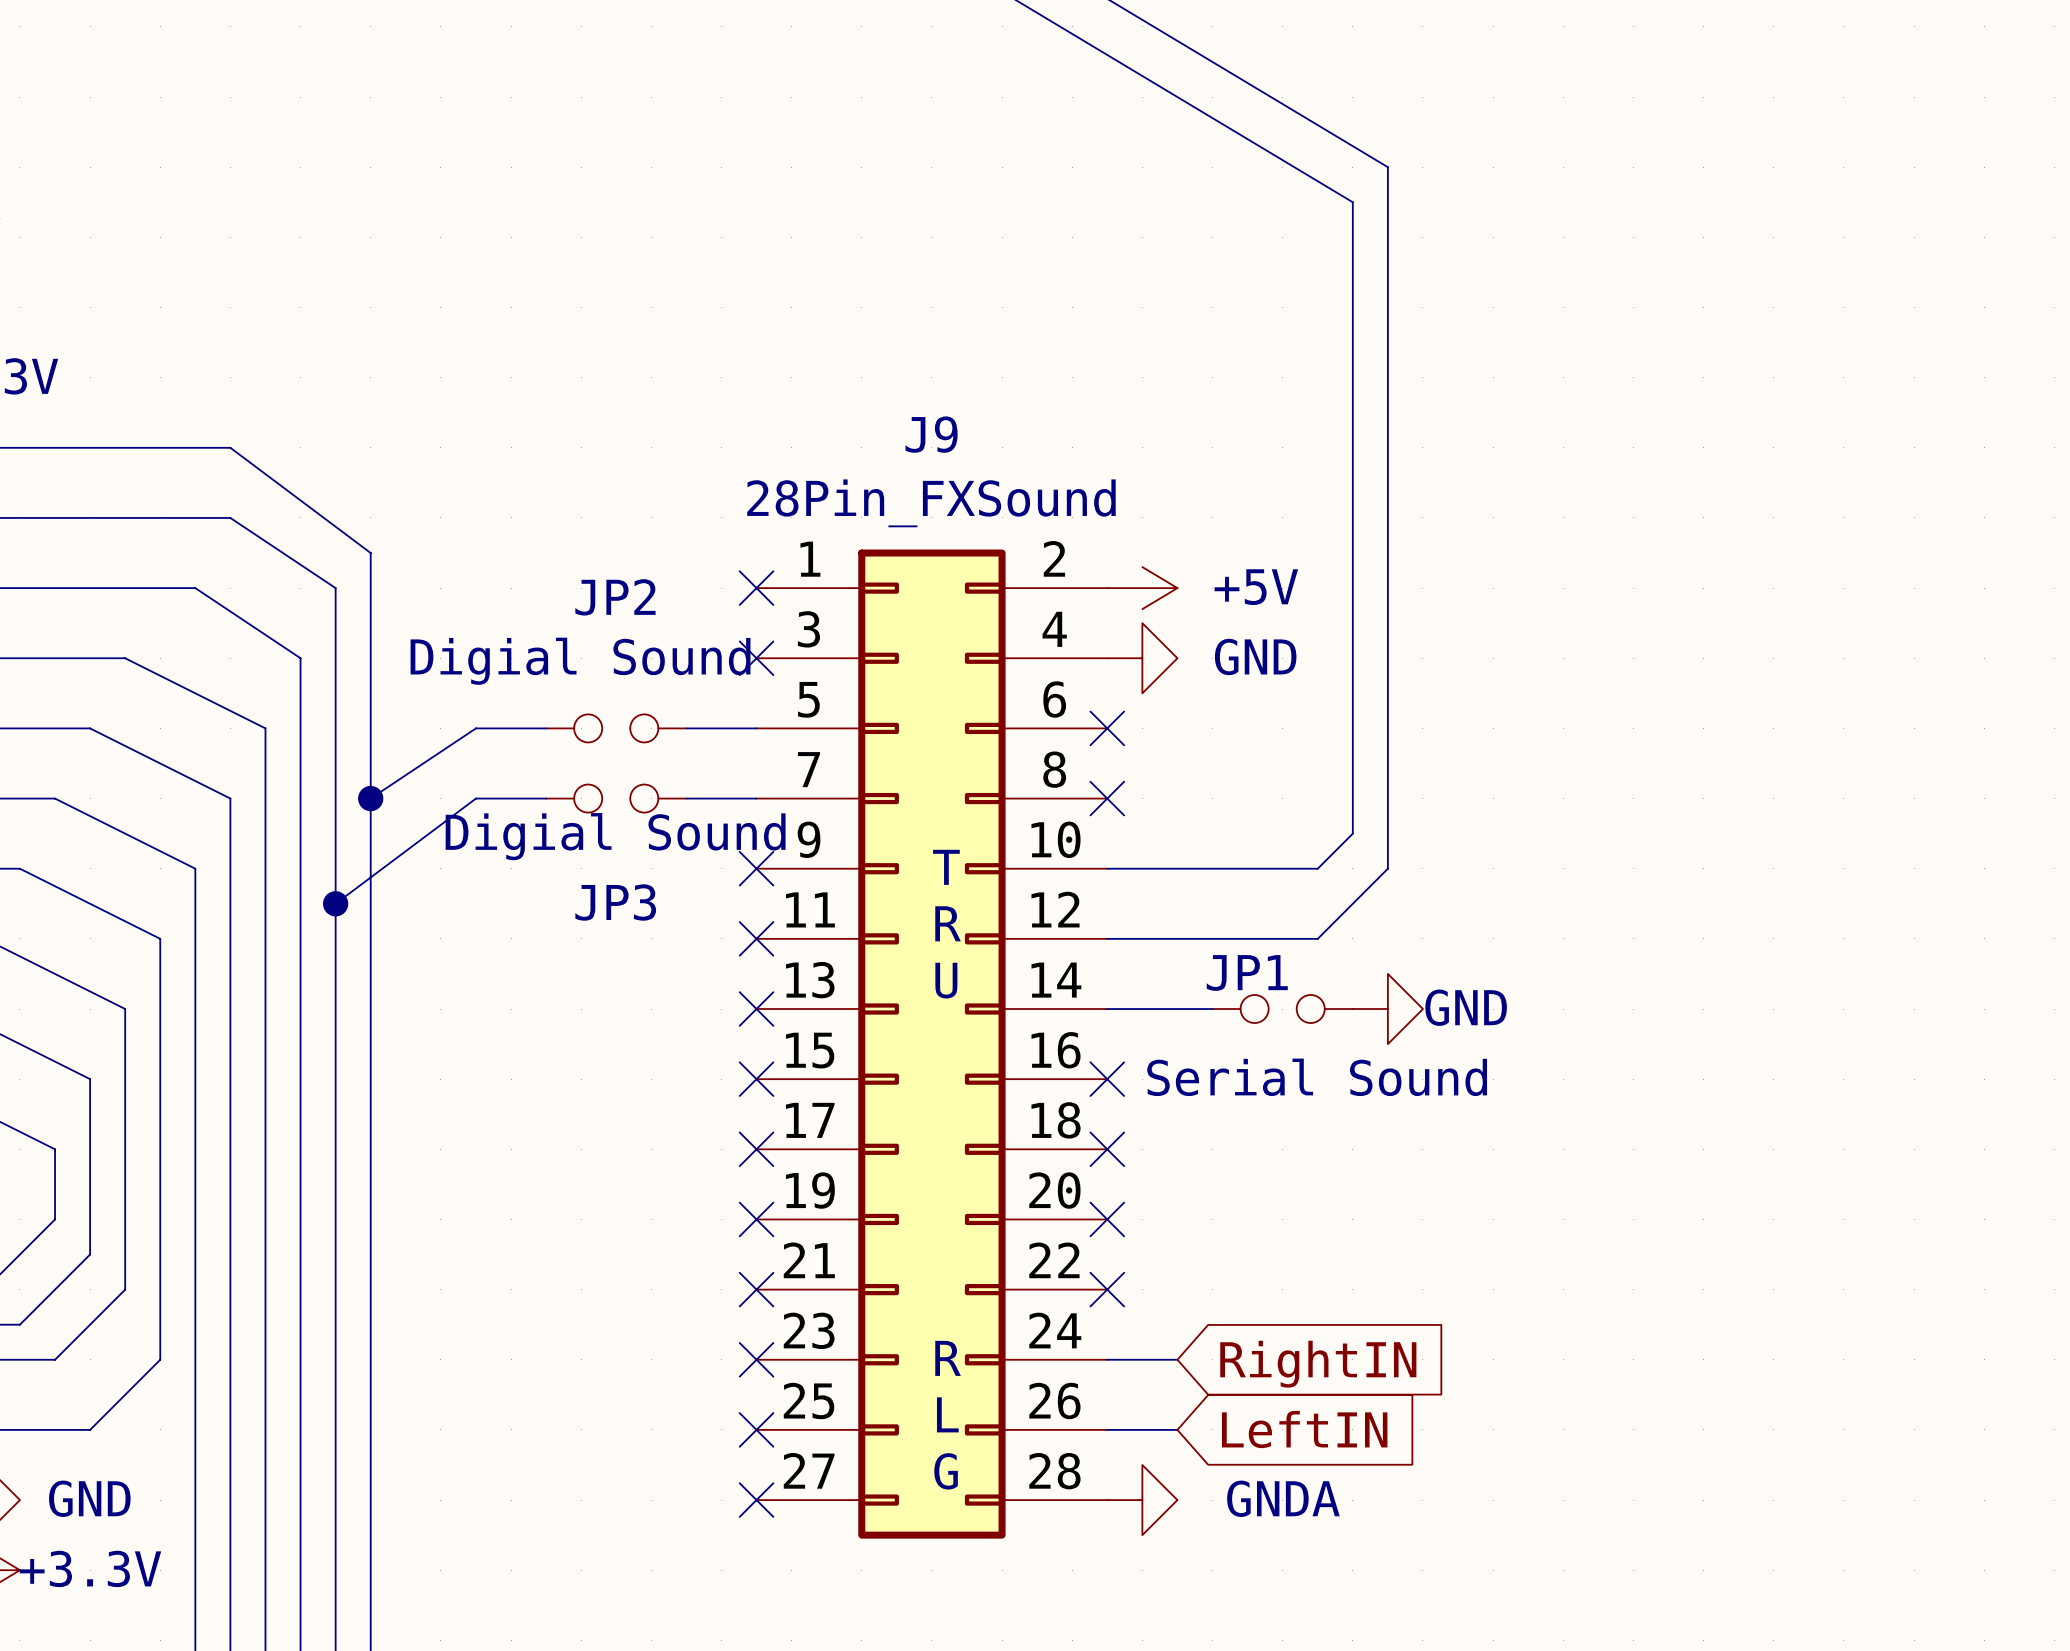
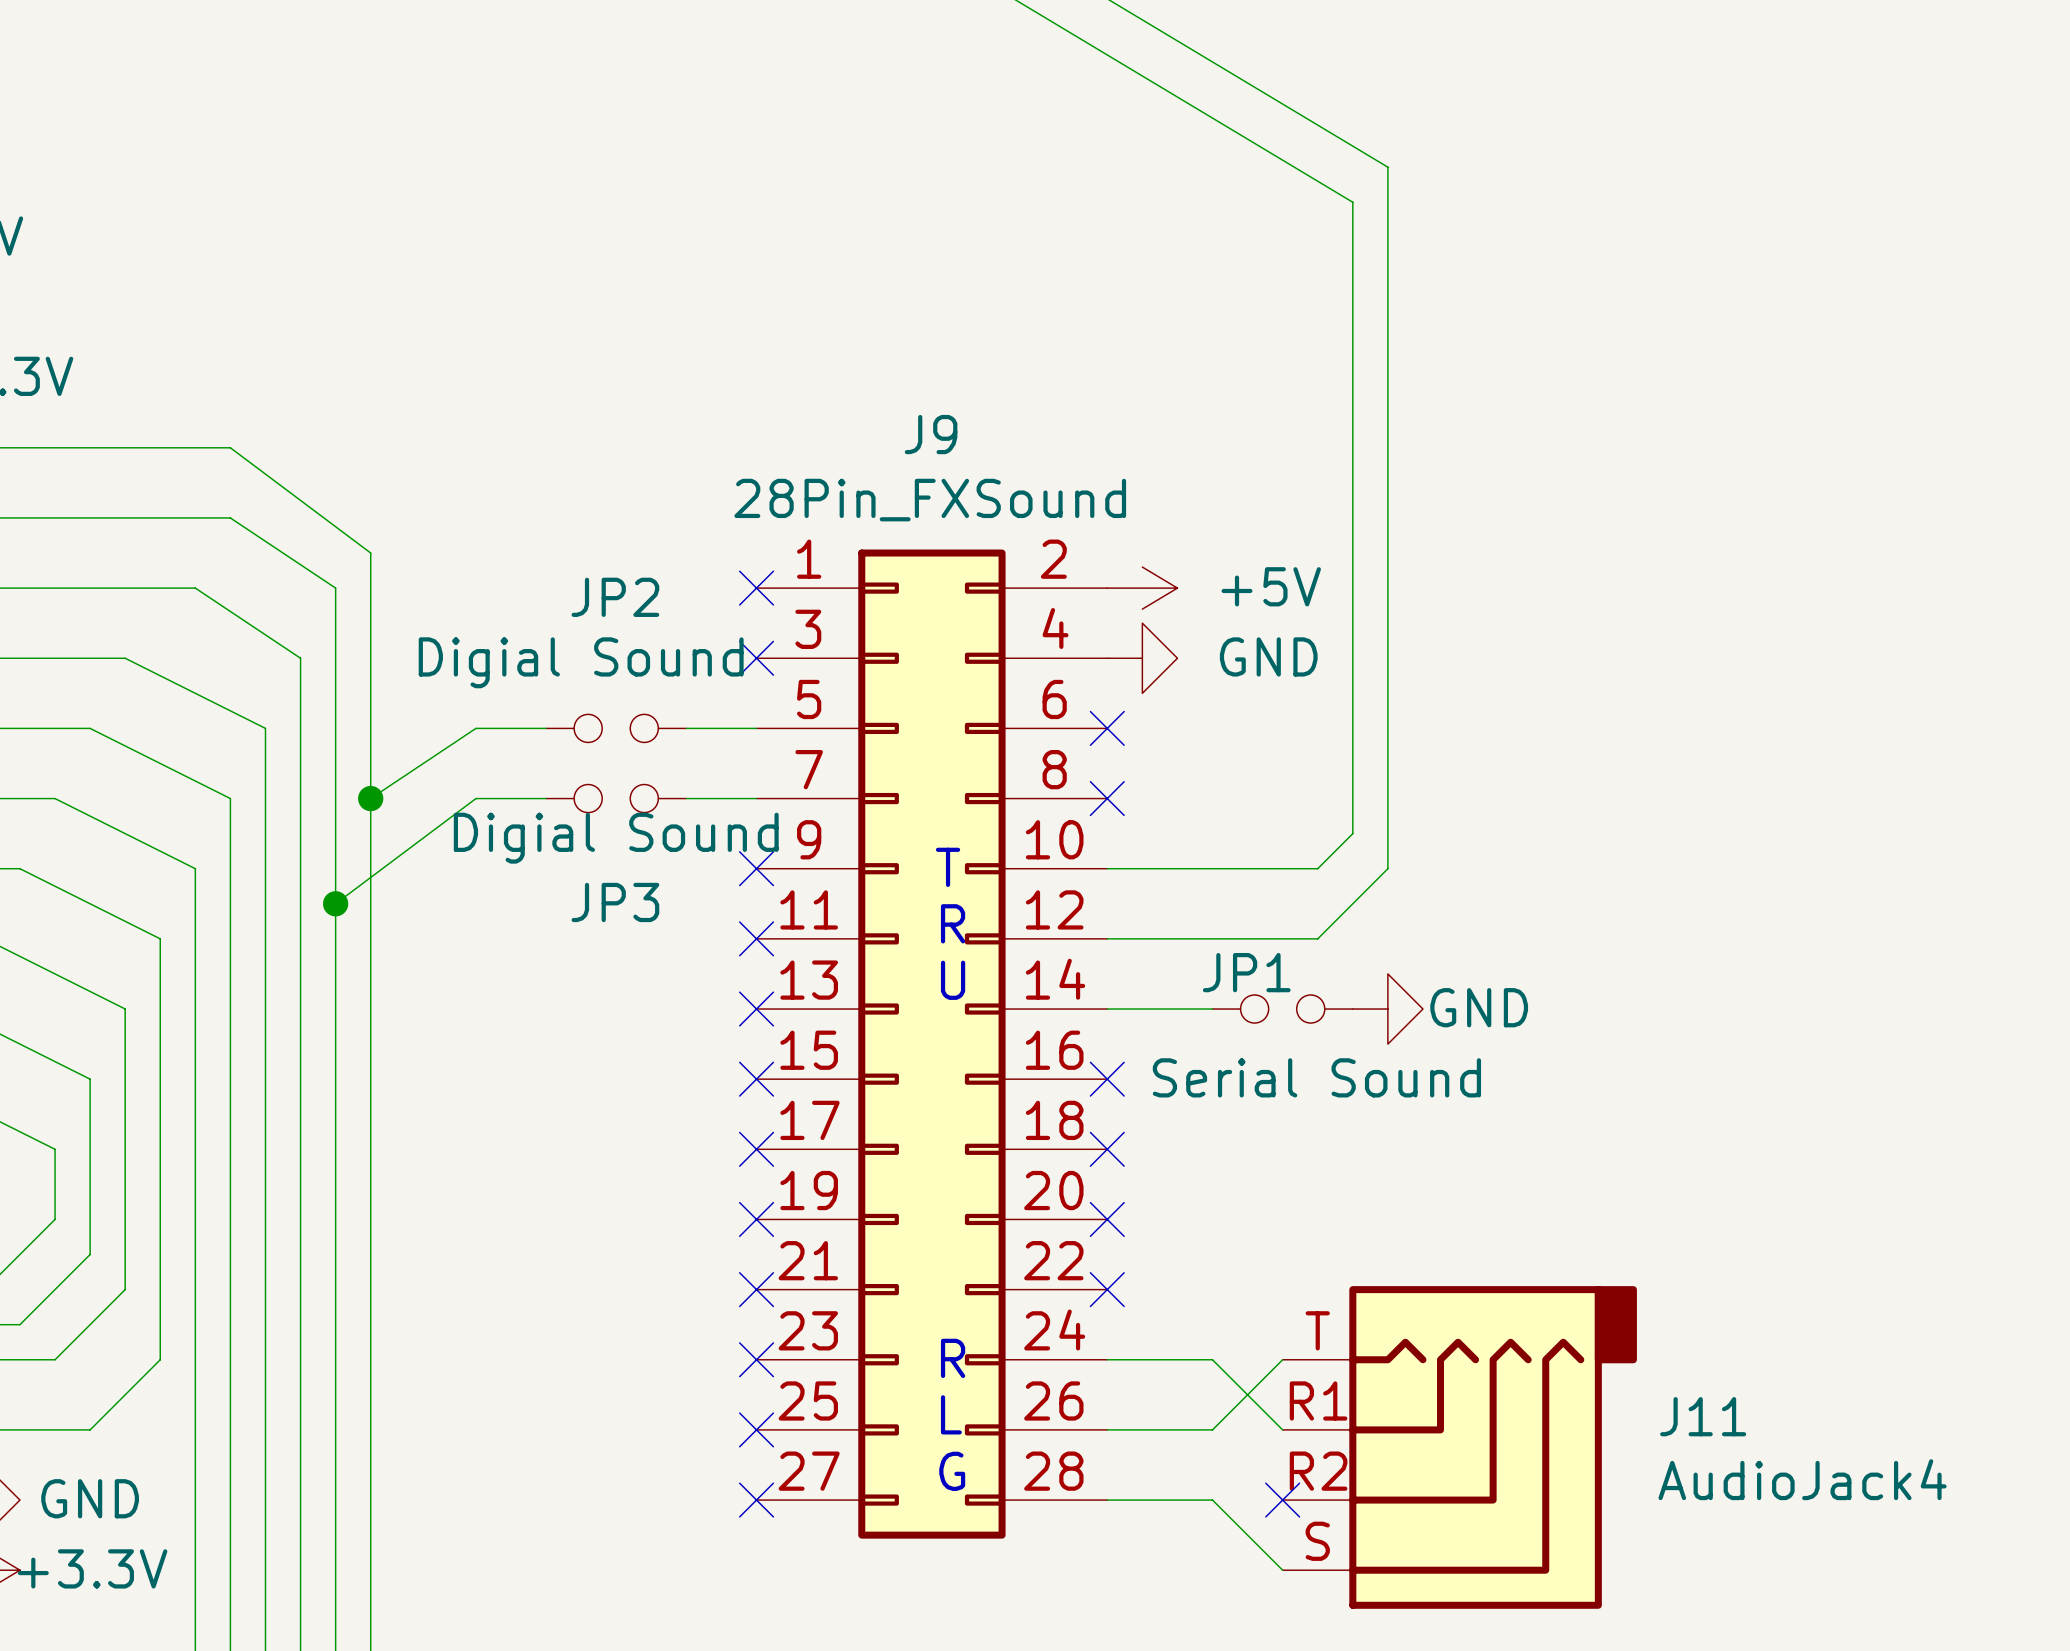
wire: none -> (1177, 1359) (1212, 1359) (1282, 1429)
wire: none -> (1282, 1359) (1212, 1429) (1177, 1429)
global label: RightIN (1318, 1364) -> none
global label: LeftIN (1304, 1429) -> none
J11: none -> AudioJack4 (1459, 1447)
wire: none -> (1107, 1500) (1212, 1500) (1282, 1570)
power symbol: GNDA (1142, 1500) -> none
no-connect mark: none -> (1282, 1500)

